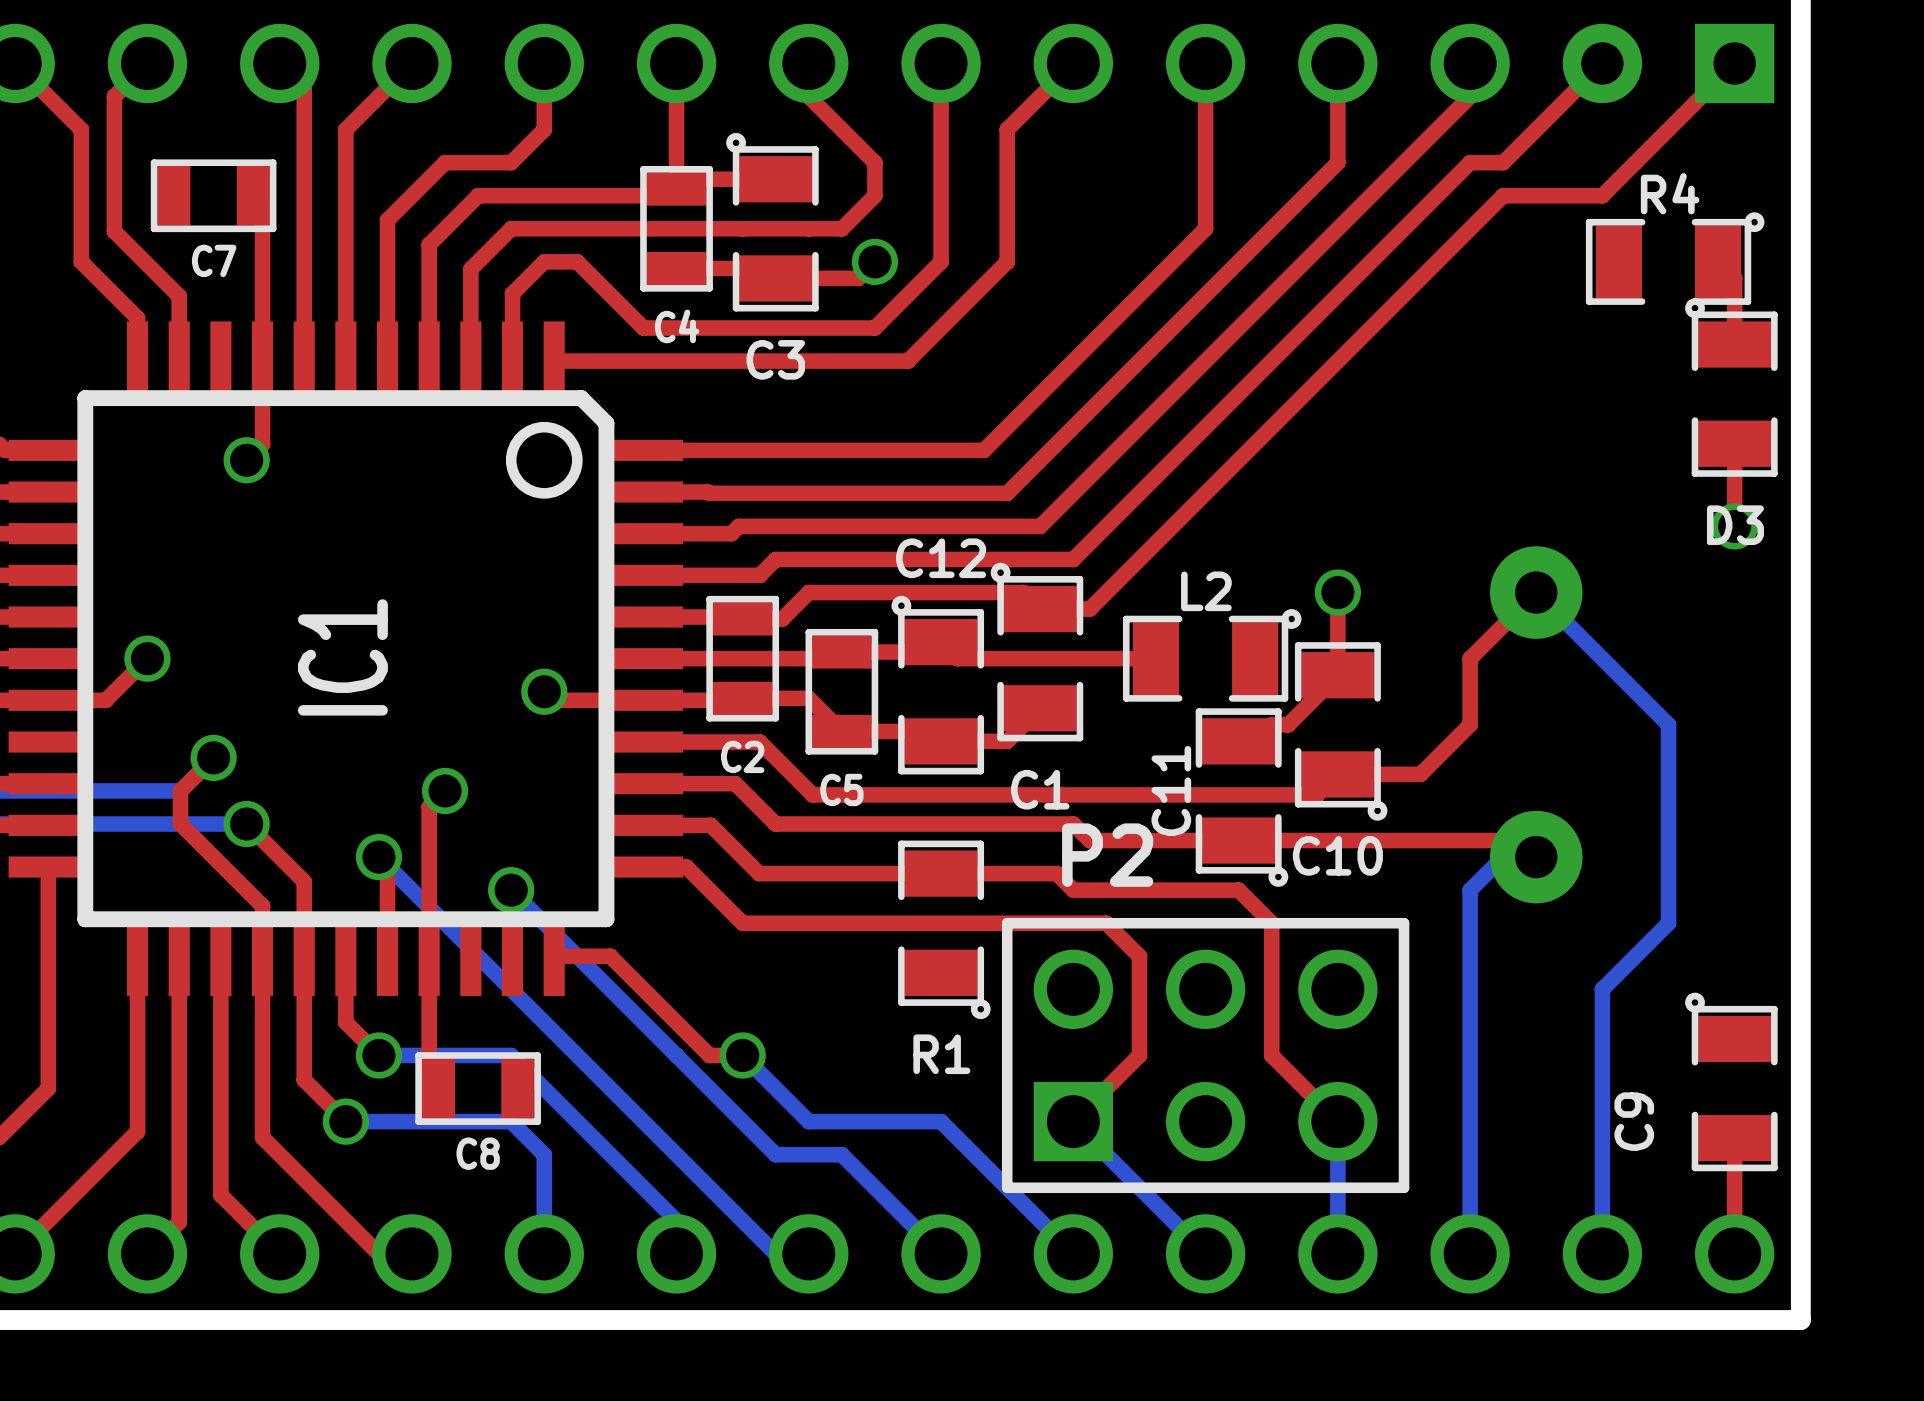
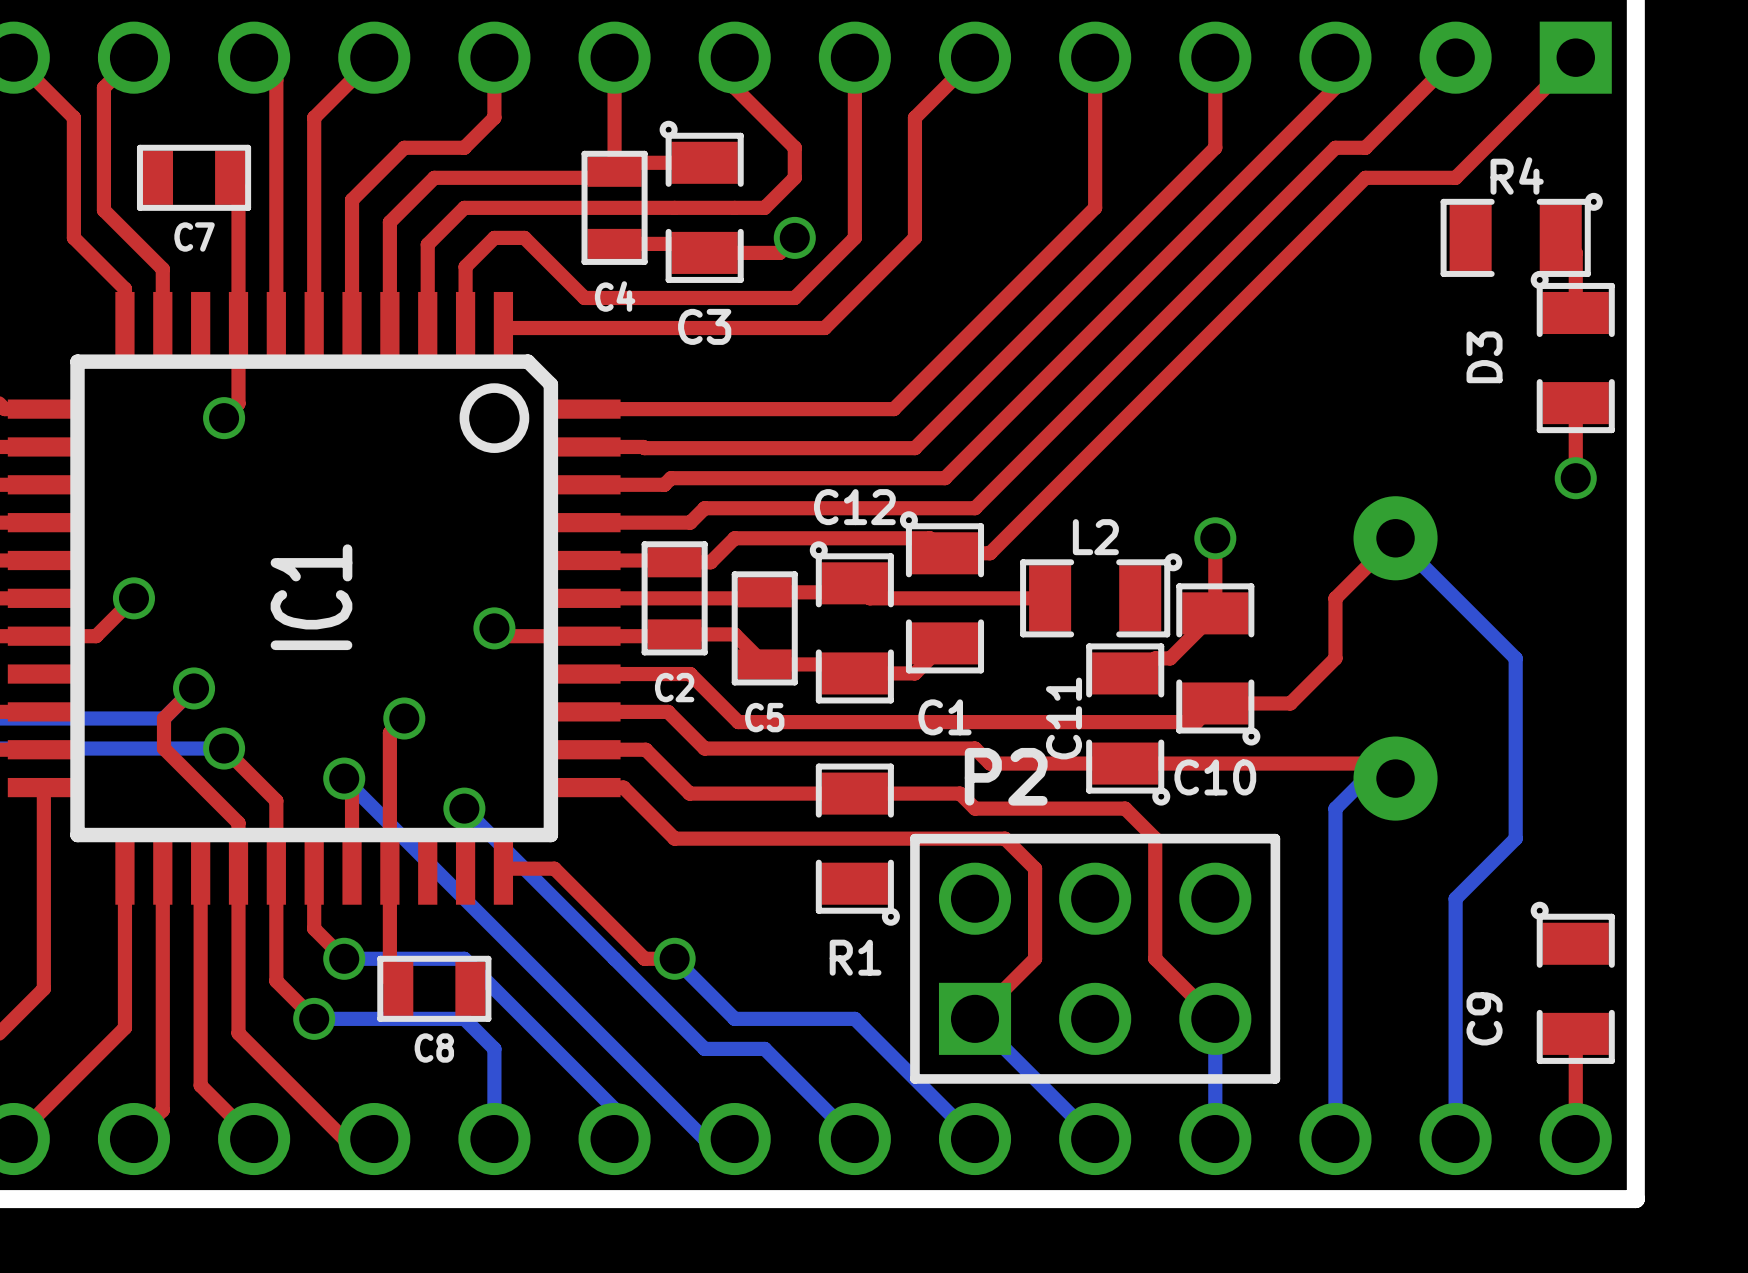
D3 name rotation: 0° (1735, 525) -> 90° counterclockwise (1484, 357)
D3 name position: D3 (1735, 525) -> D3 (1484, 357)

